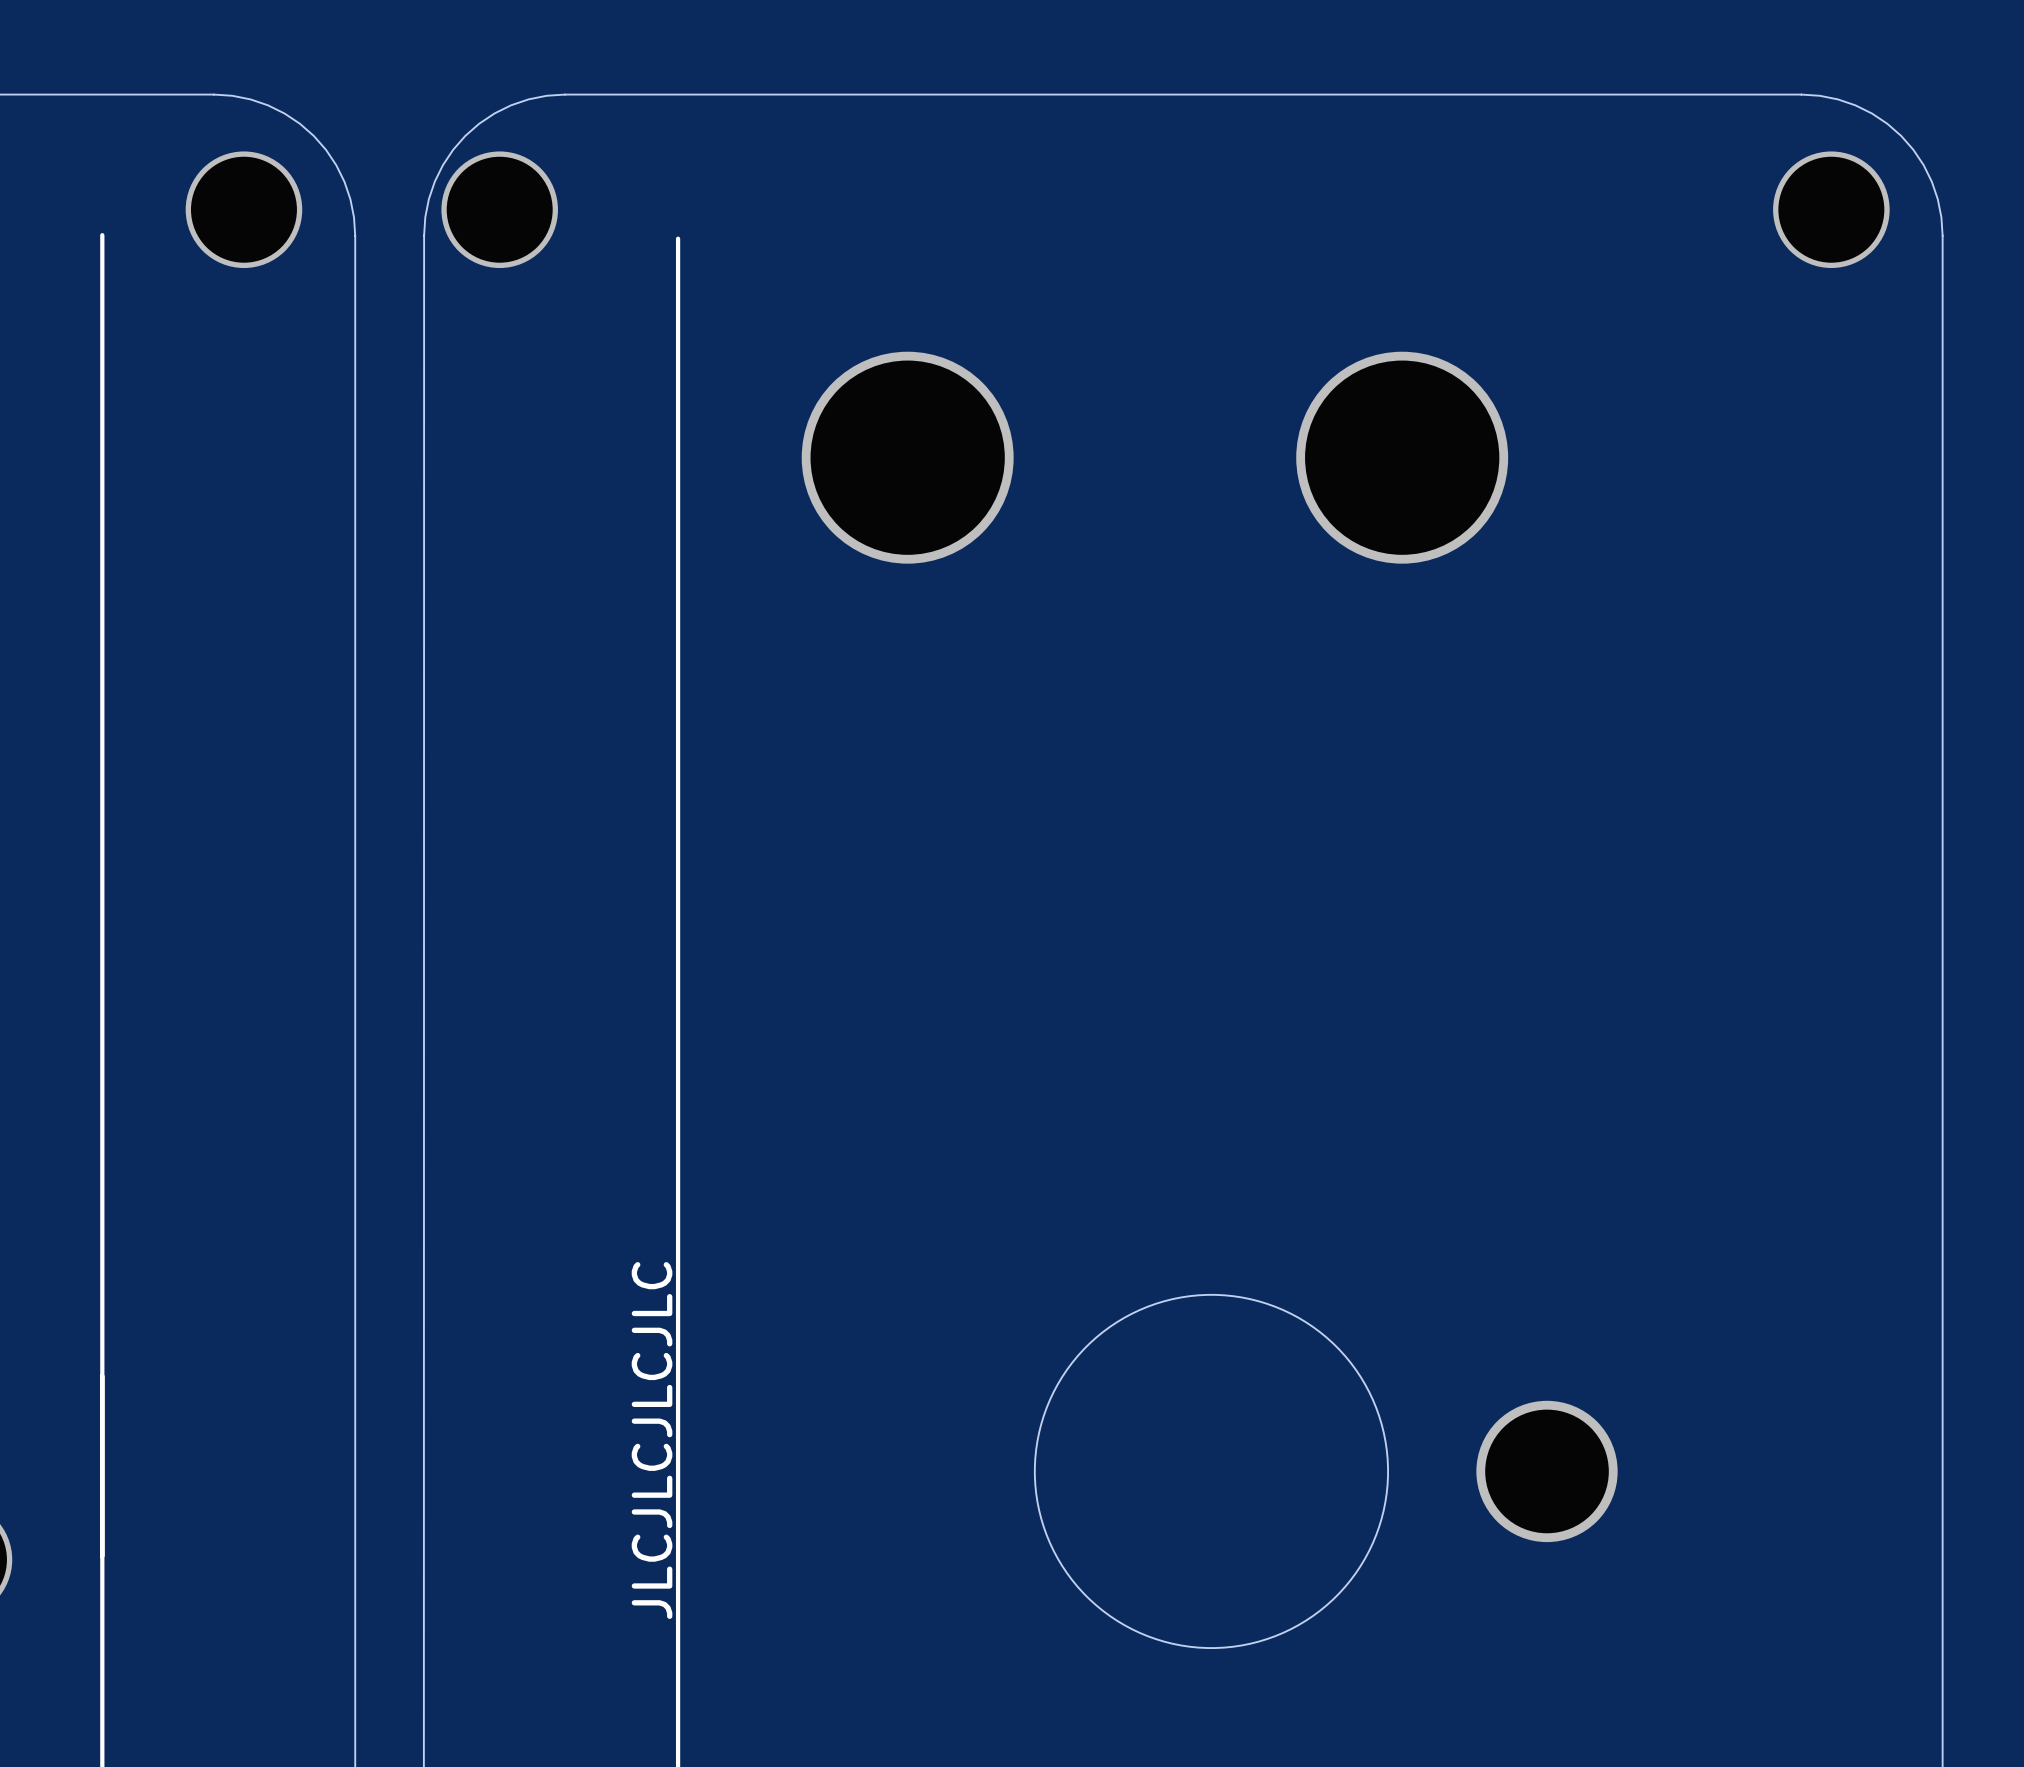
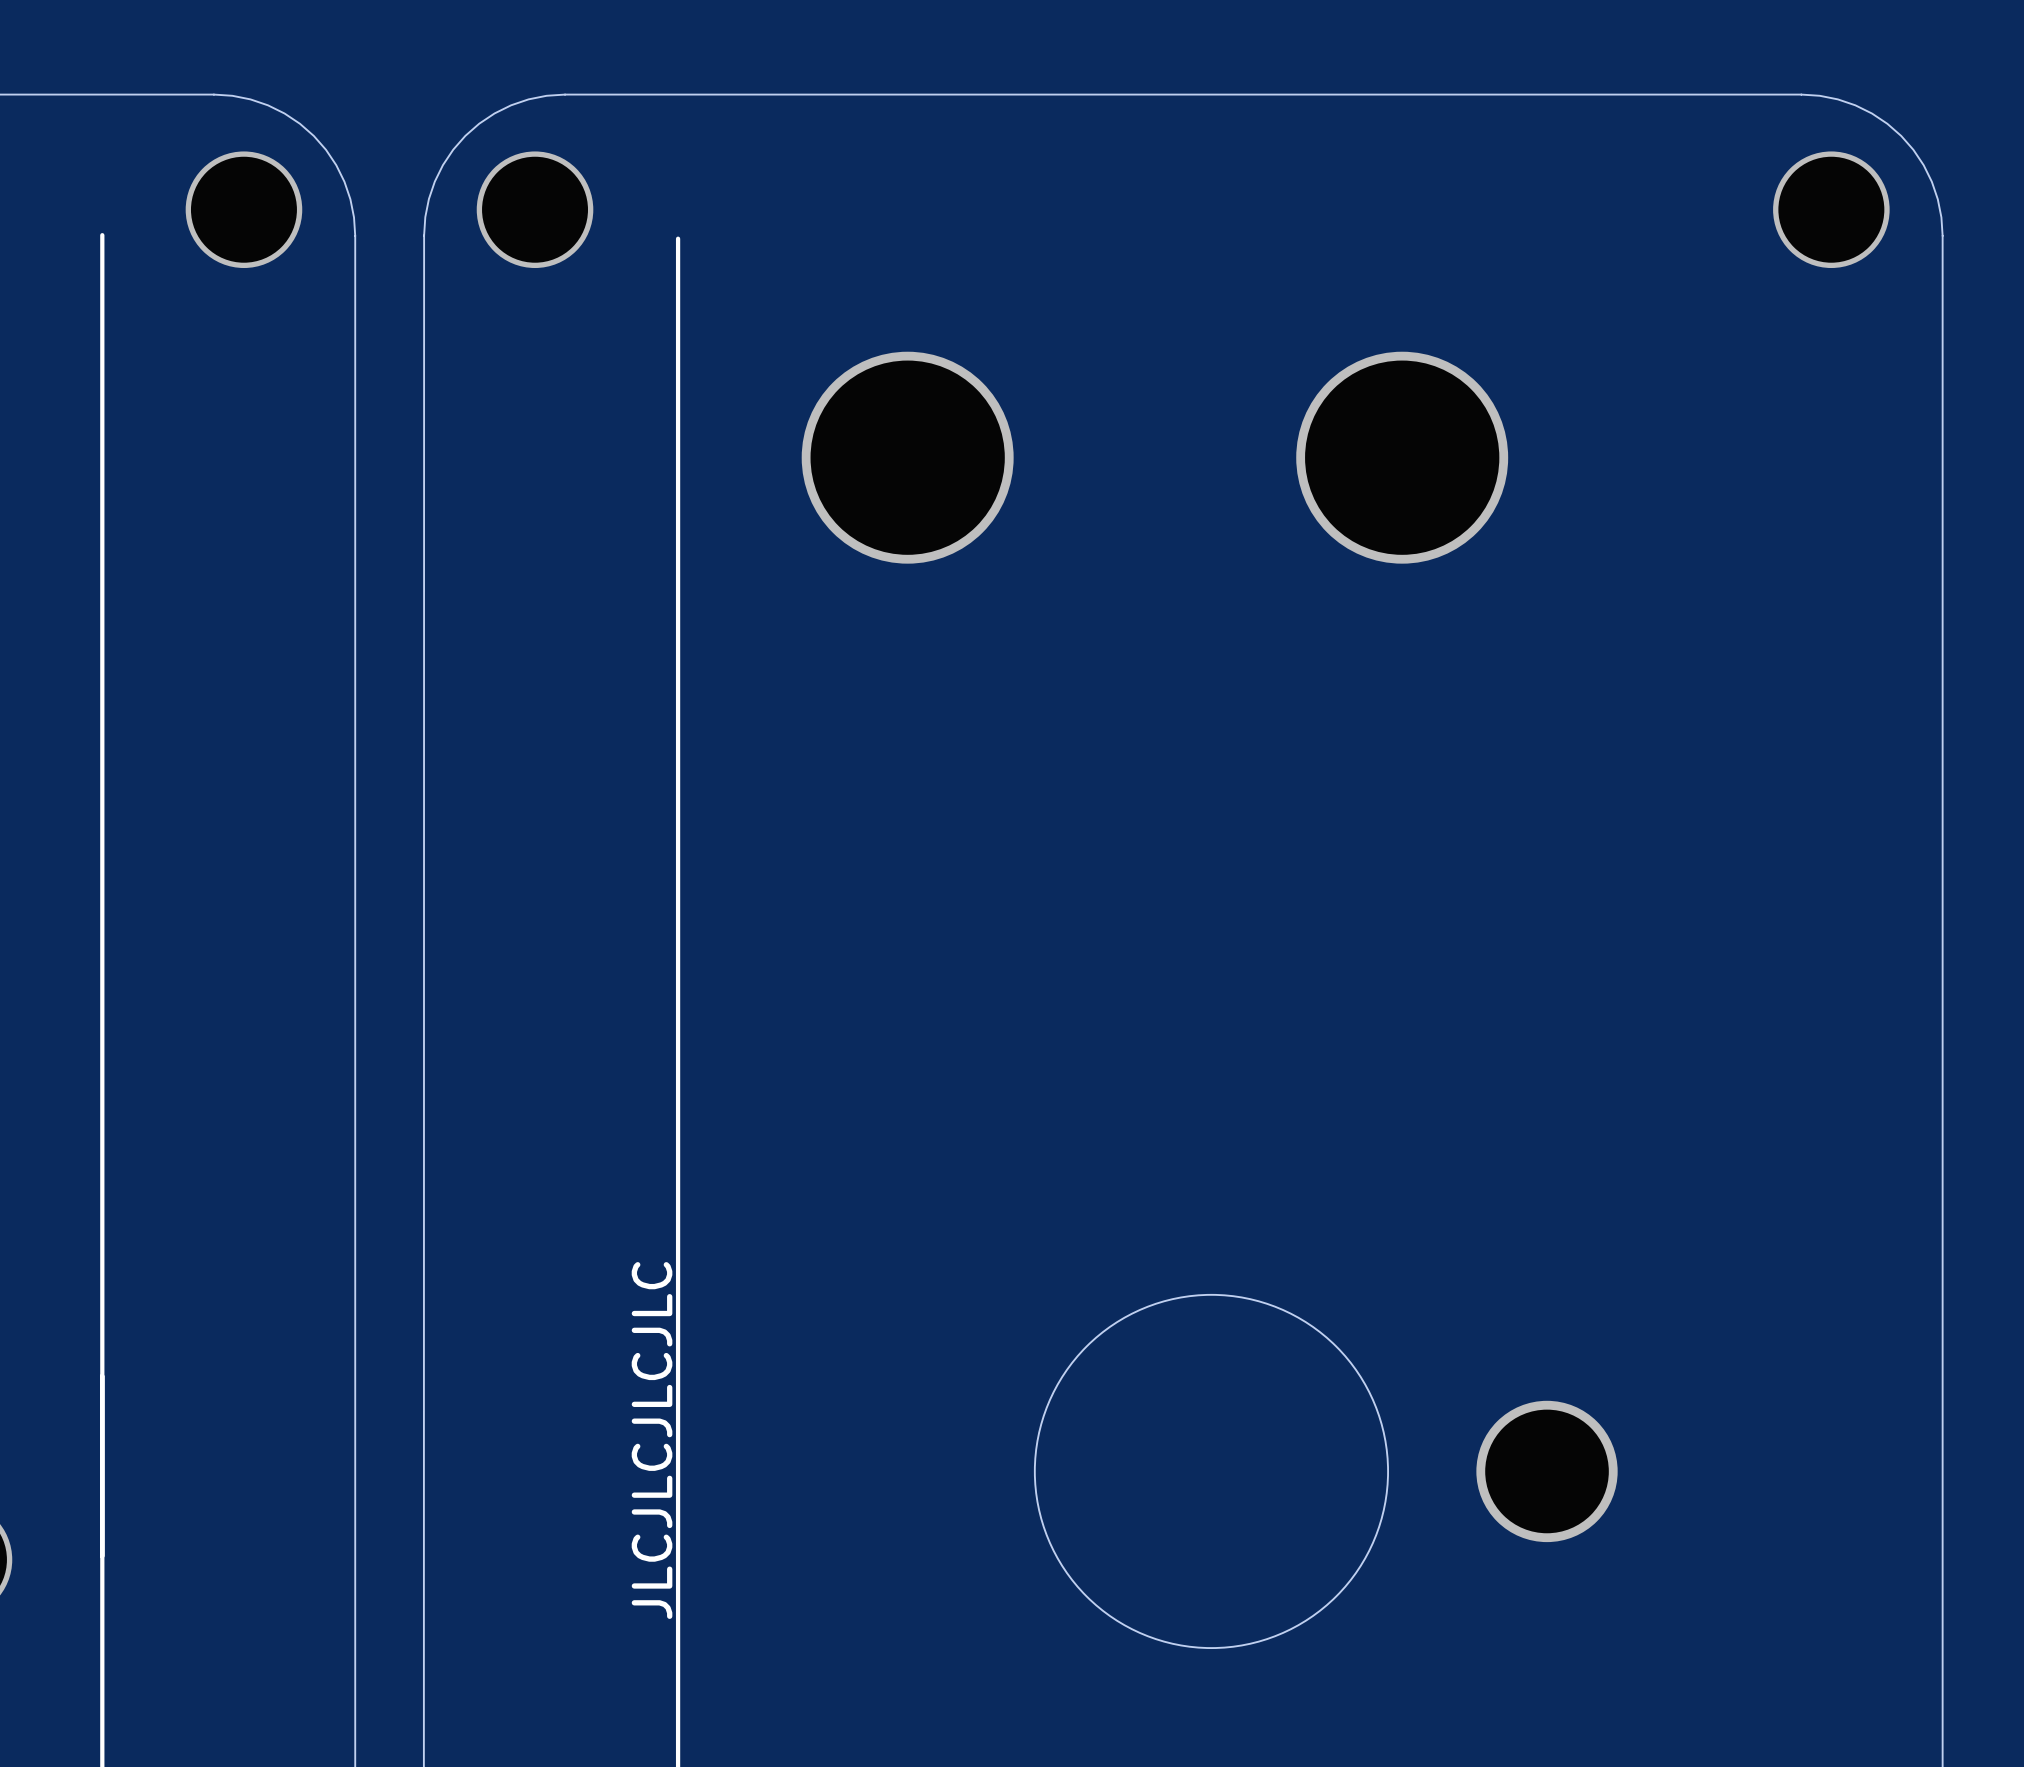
via position: (499, 209) -> (535, 209)

